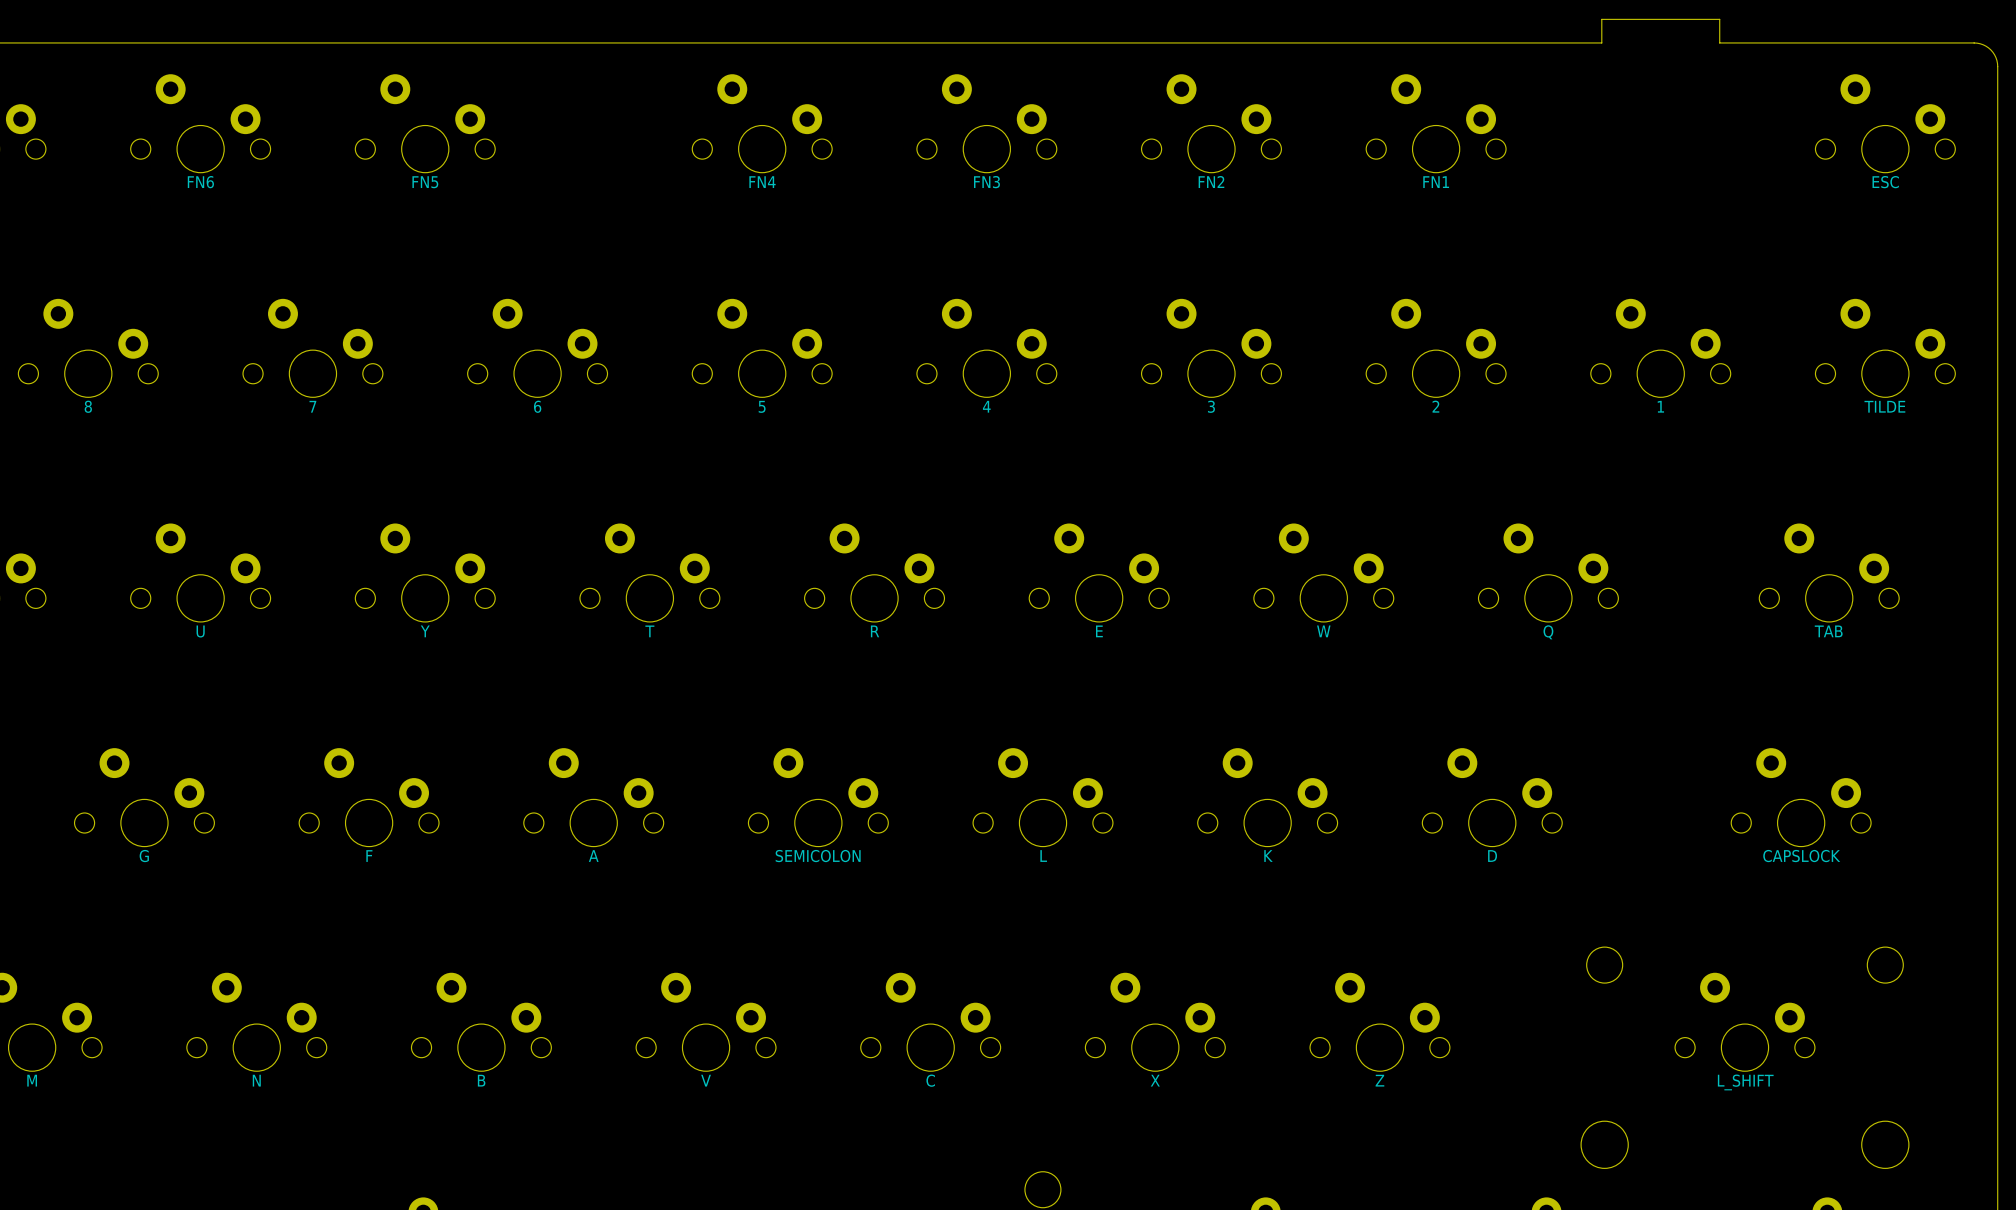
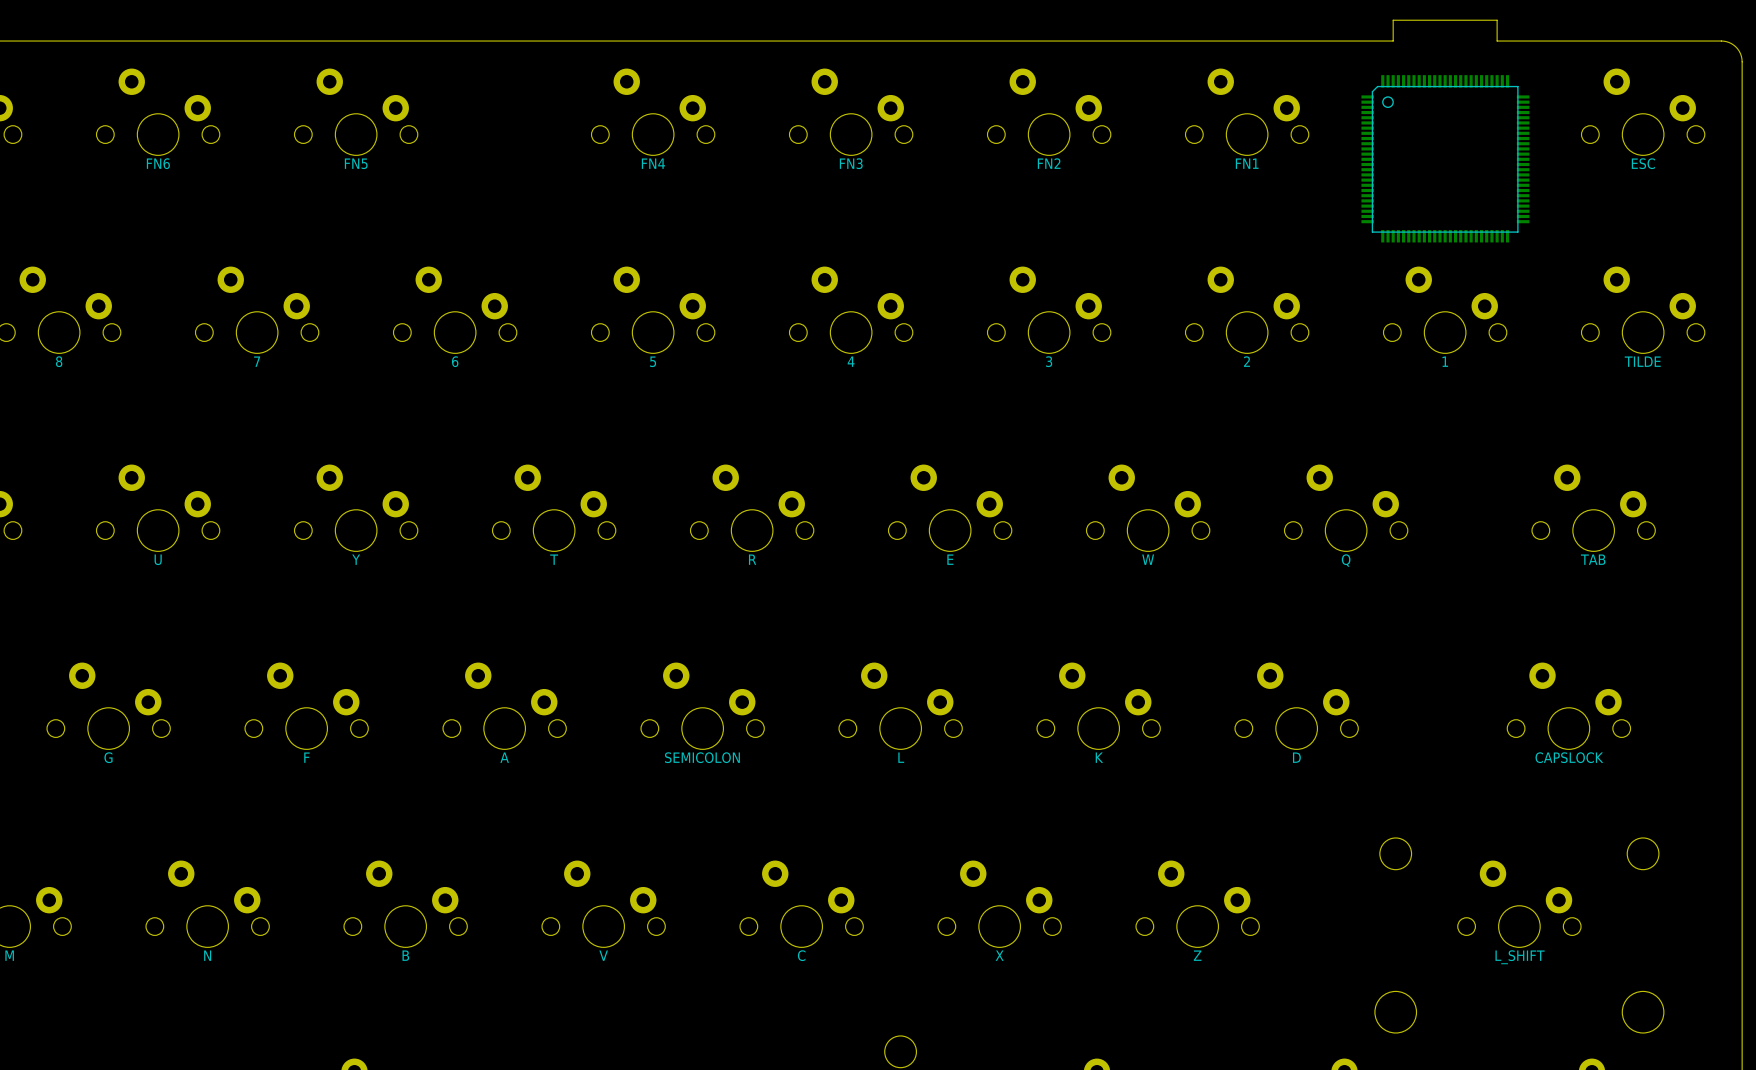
part: none -> (1445, 158)

